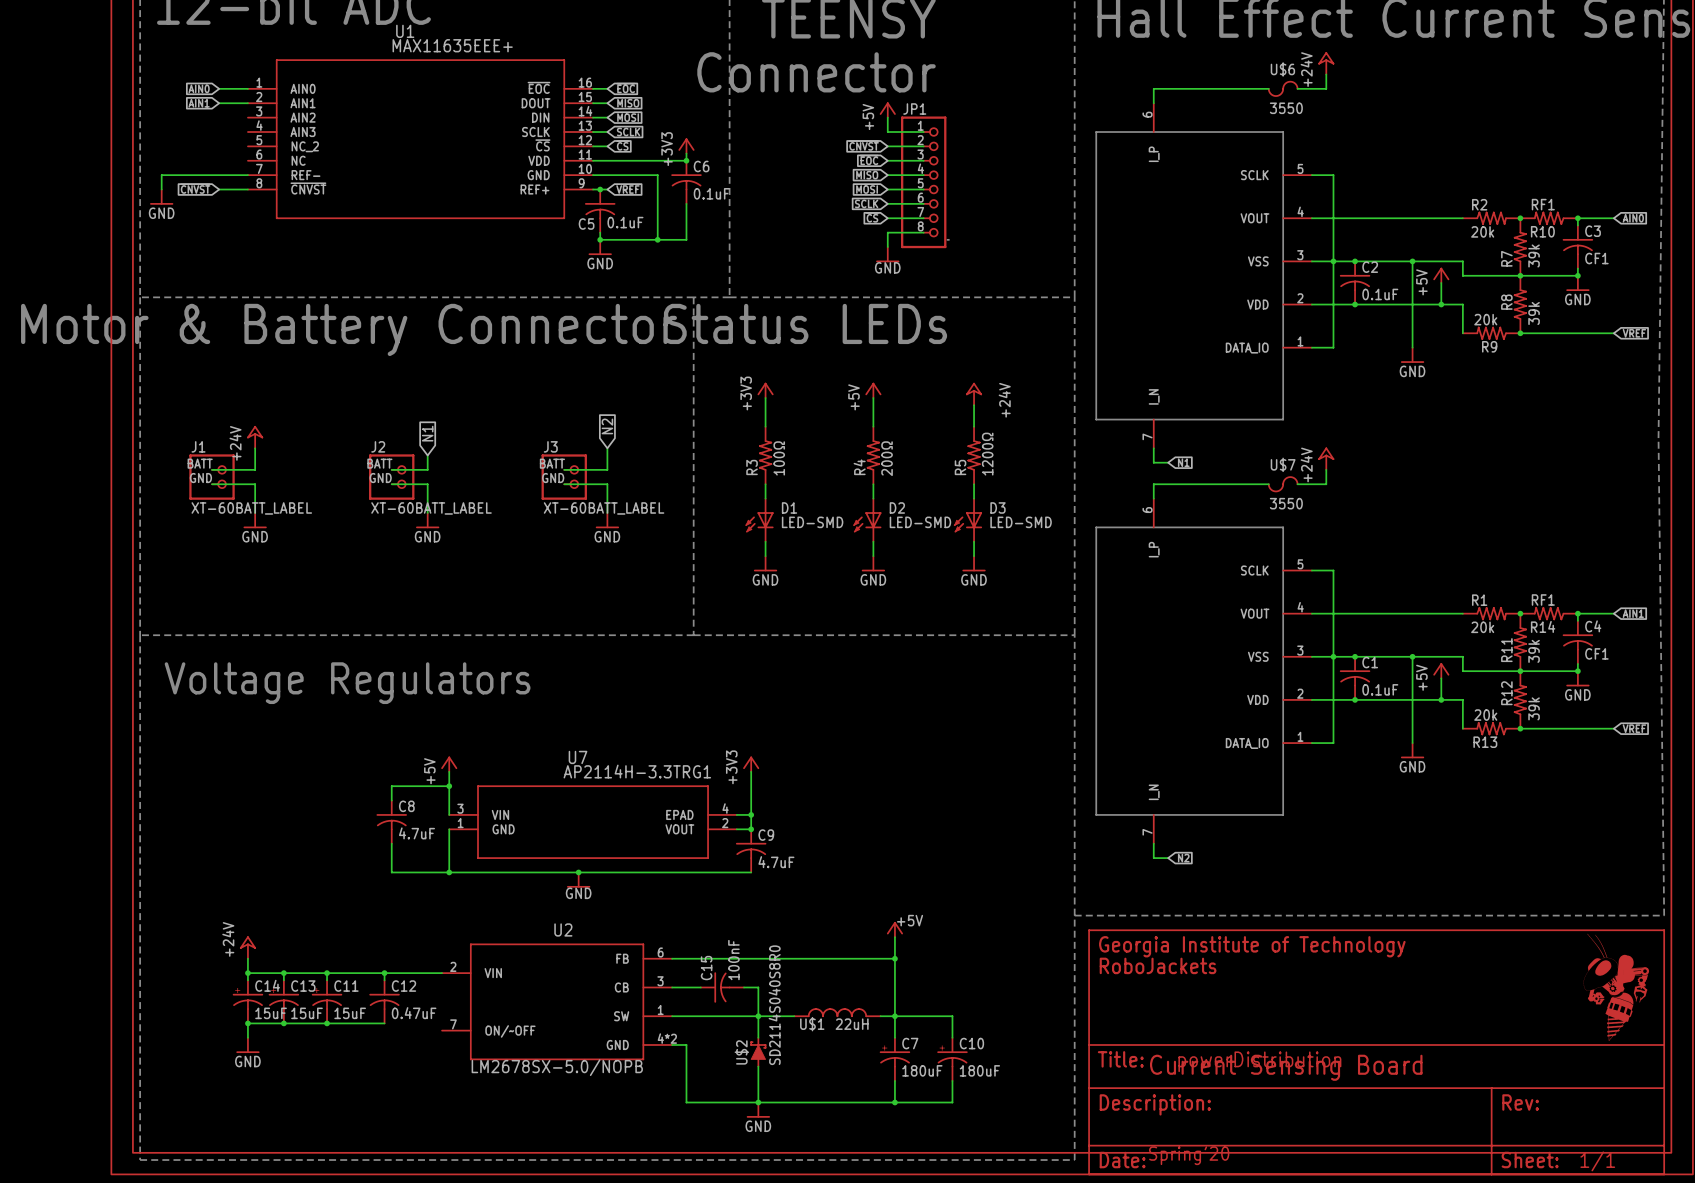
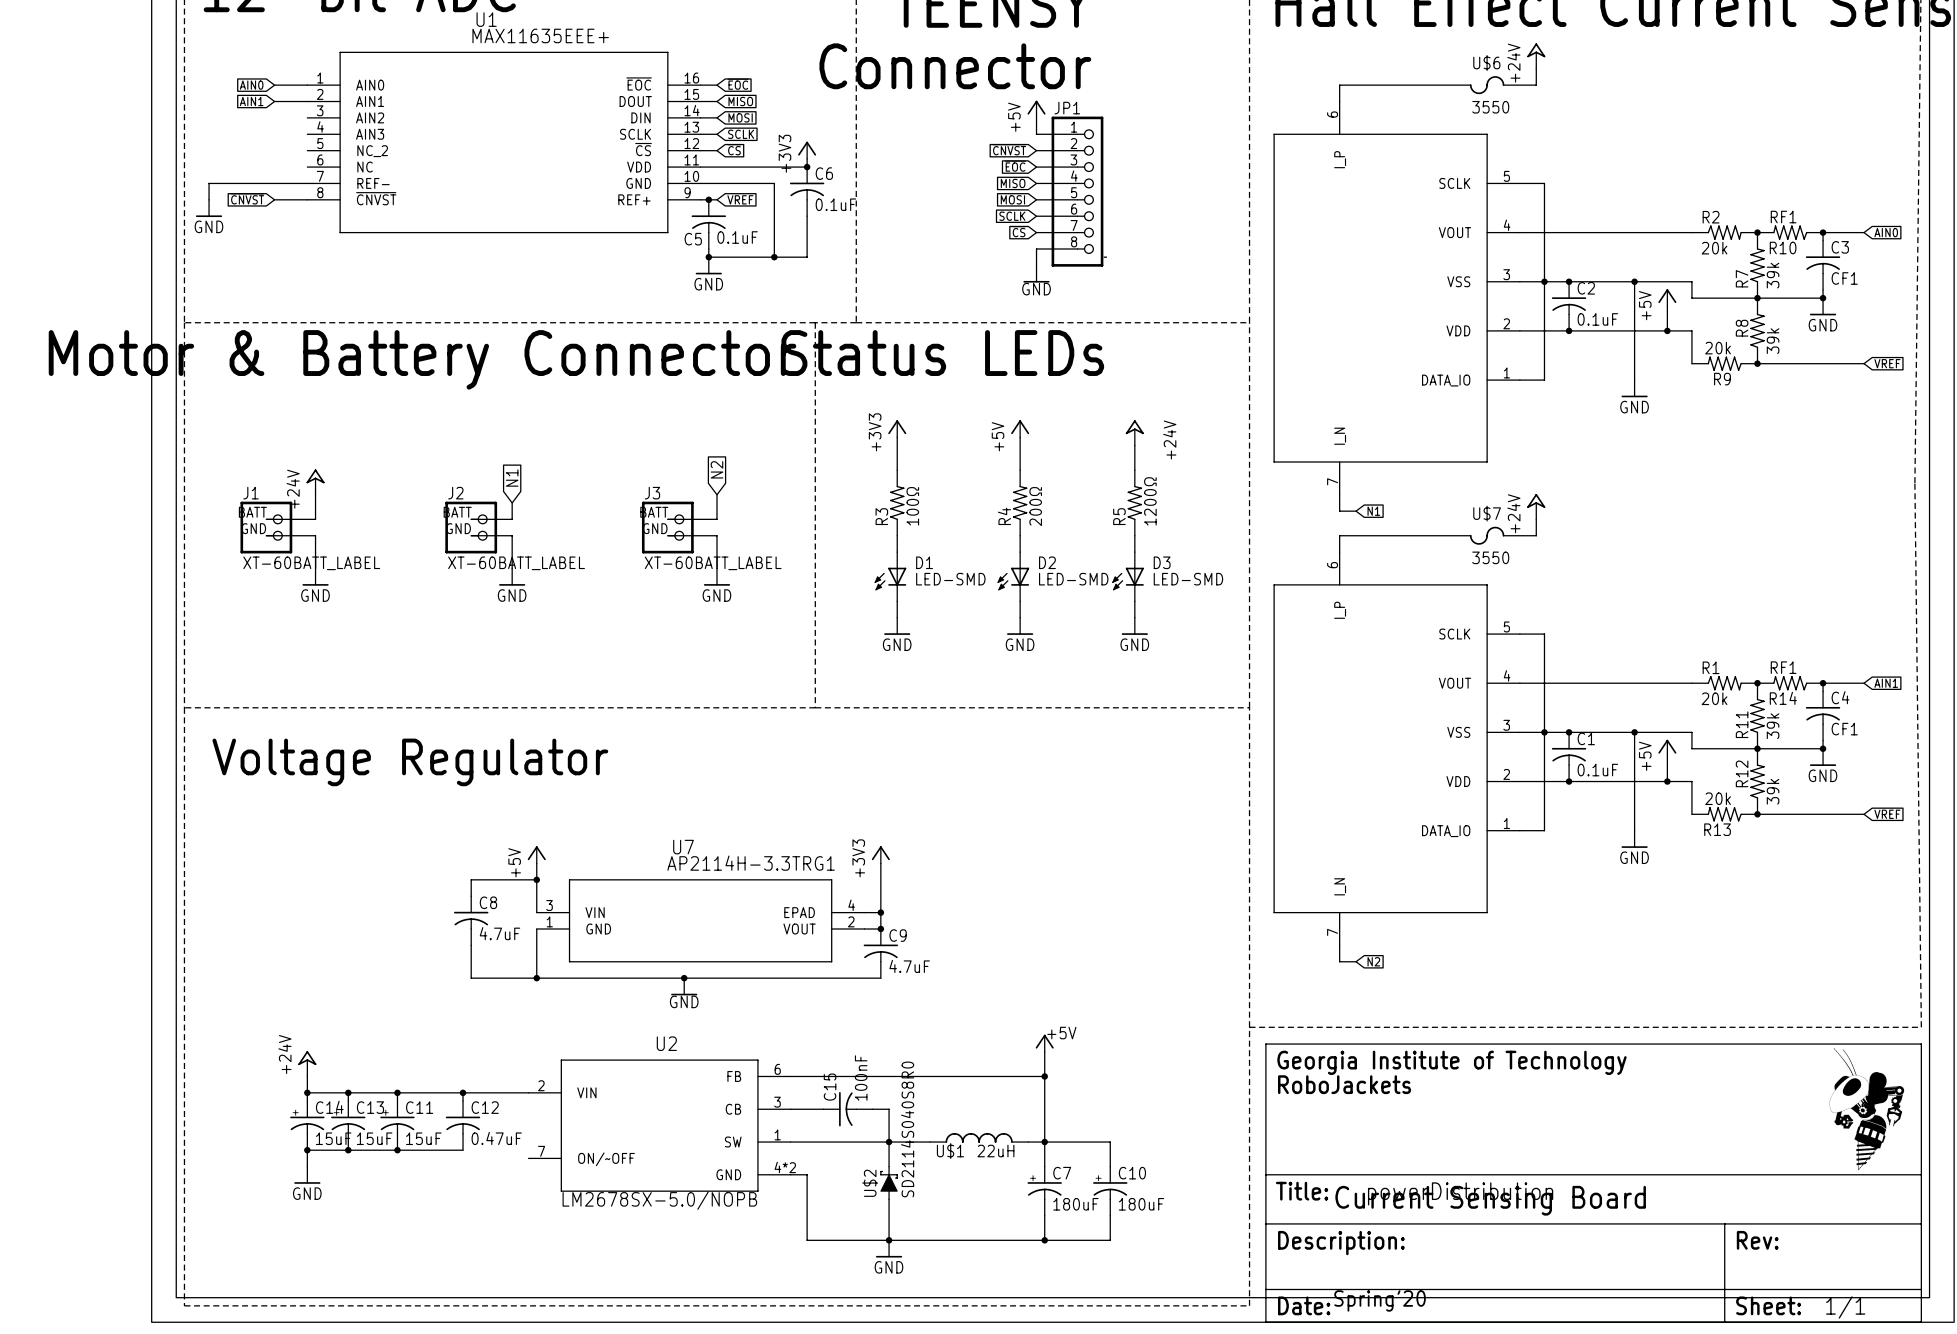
text: Voltage Regulators (347, 683) -> Voltage Regulator (410, 762)

